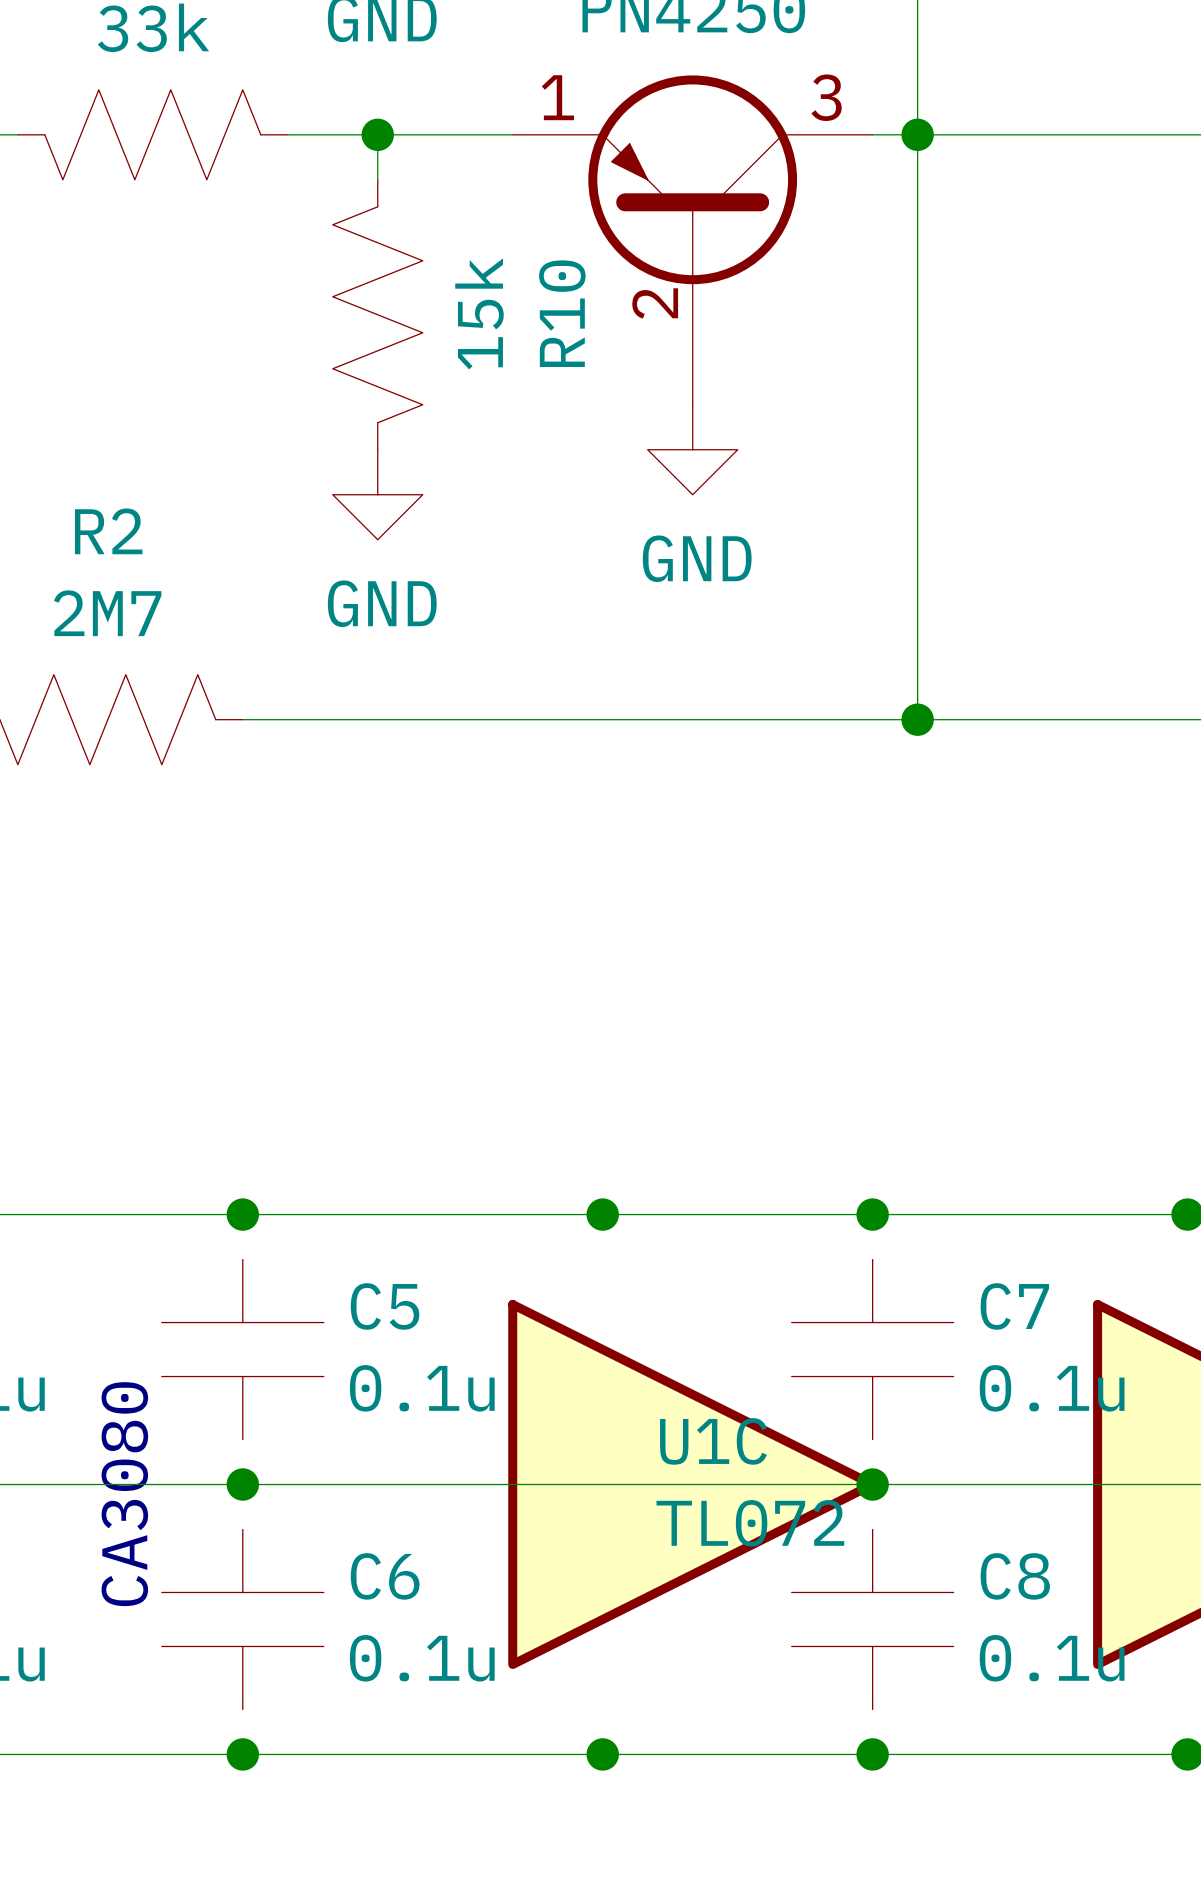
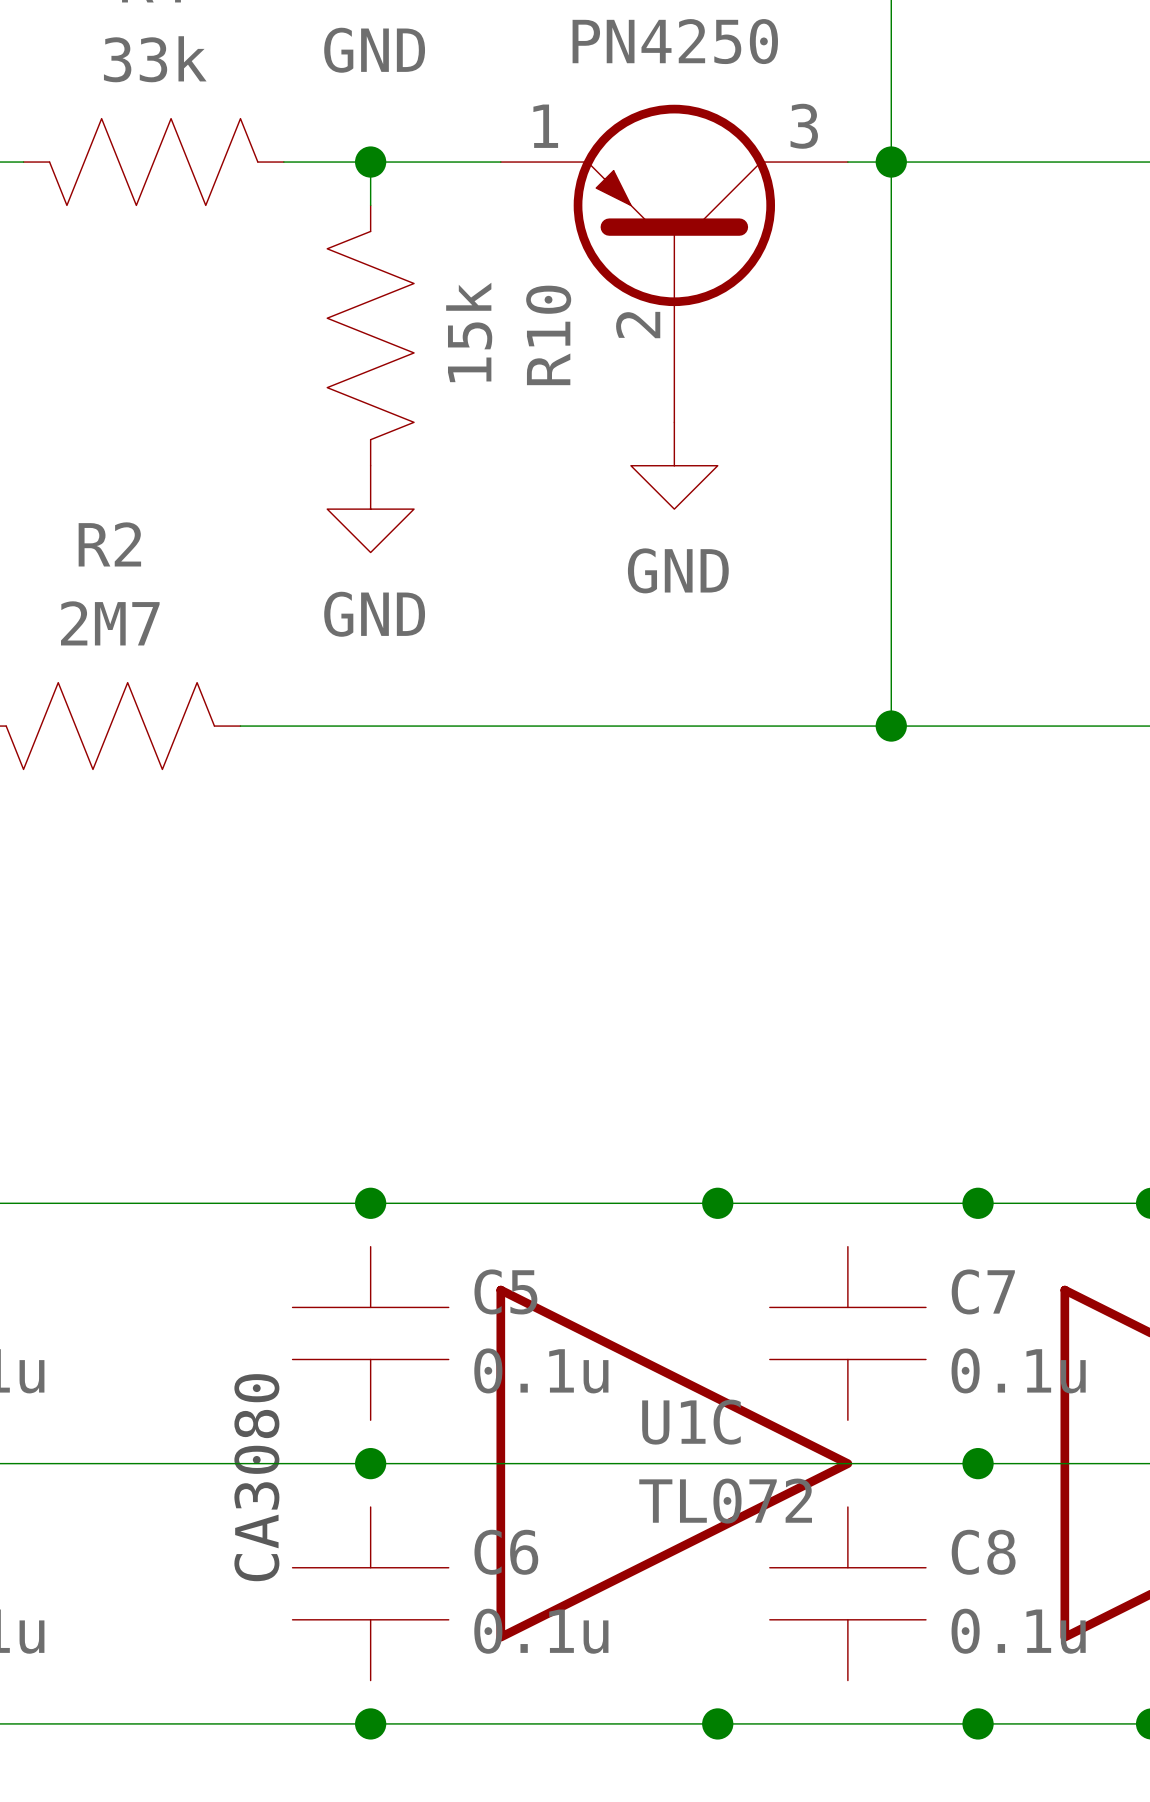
junction: (242, 1214) -> none
junction: none -> (370, 1203)
junction: (602, 1214) -> none
junction: none -> (717, 1203)
junction: (872, 1214) -> none
junction: none -> (978, 1203)
C5 position: (242, 1349) -> (370, 1333)
junction position: (242, 1484) -> (370, 1463)
junction position: (872, 1484) -> (978, 1463)
text position: CA3080 (124, 1494) -> CA3080 (256, 1477)
C6 position: (242, 1619) -> (370, 1593)
junction: (242, 1754) -> none
junction: none -> (370, 1723)
junction: (602, 1754) -> none
junction: none -> (717, 1723)
junction: (872, 1754) -> none
junction: none -> (978, 1723)

